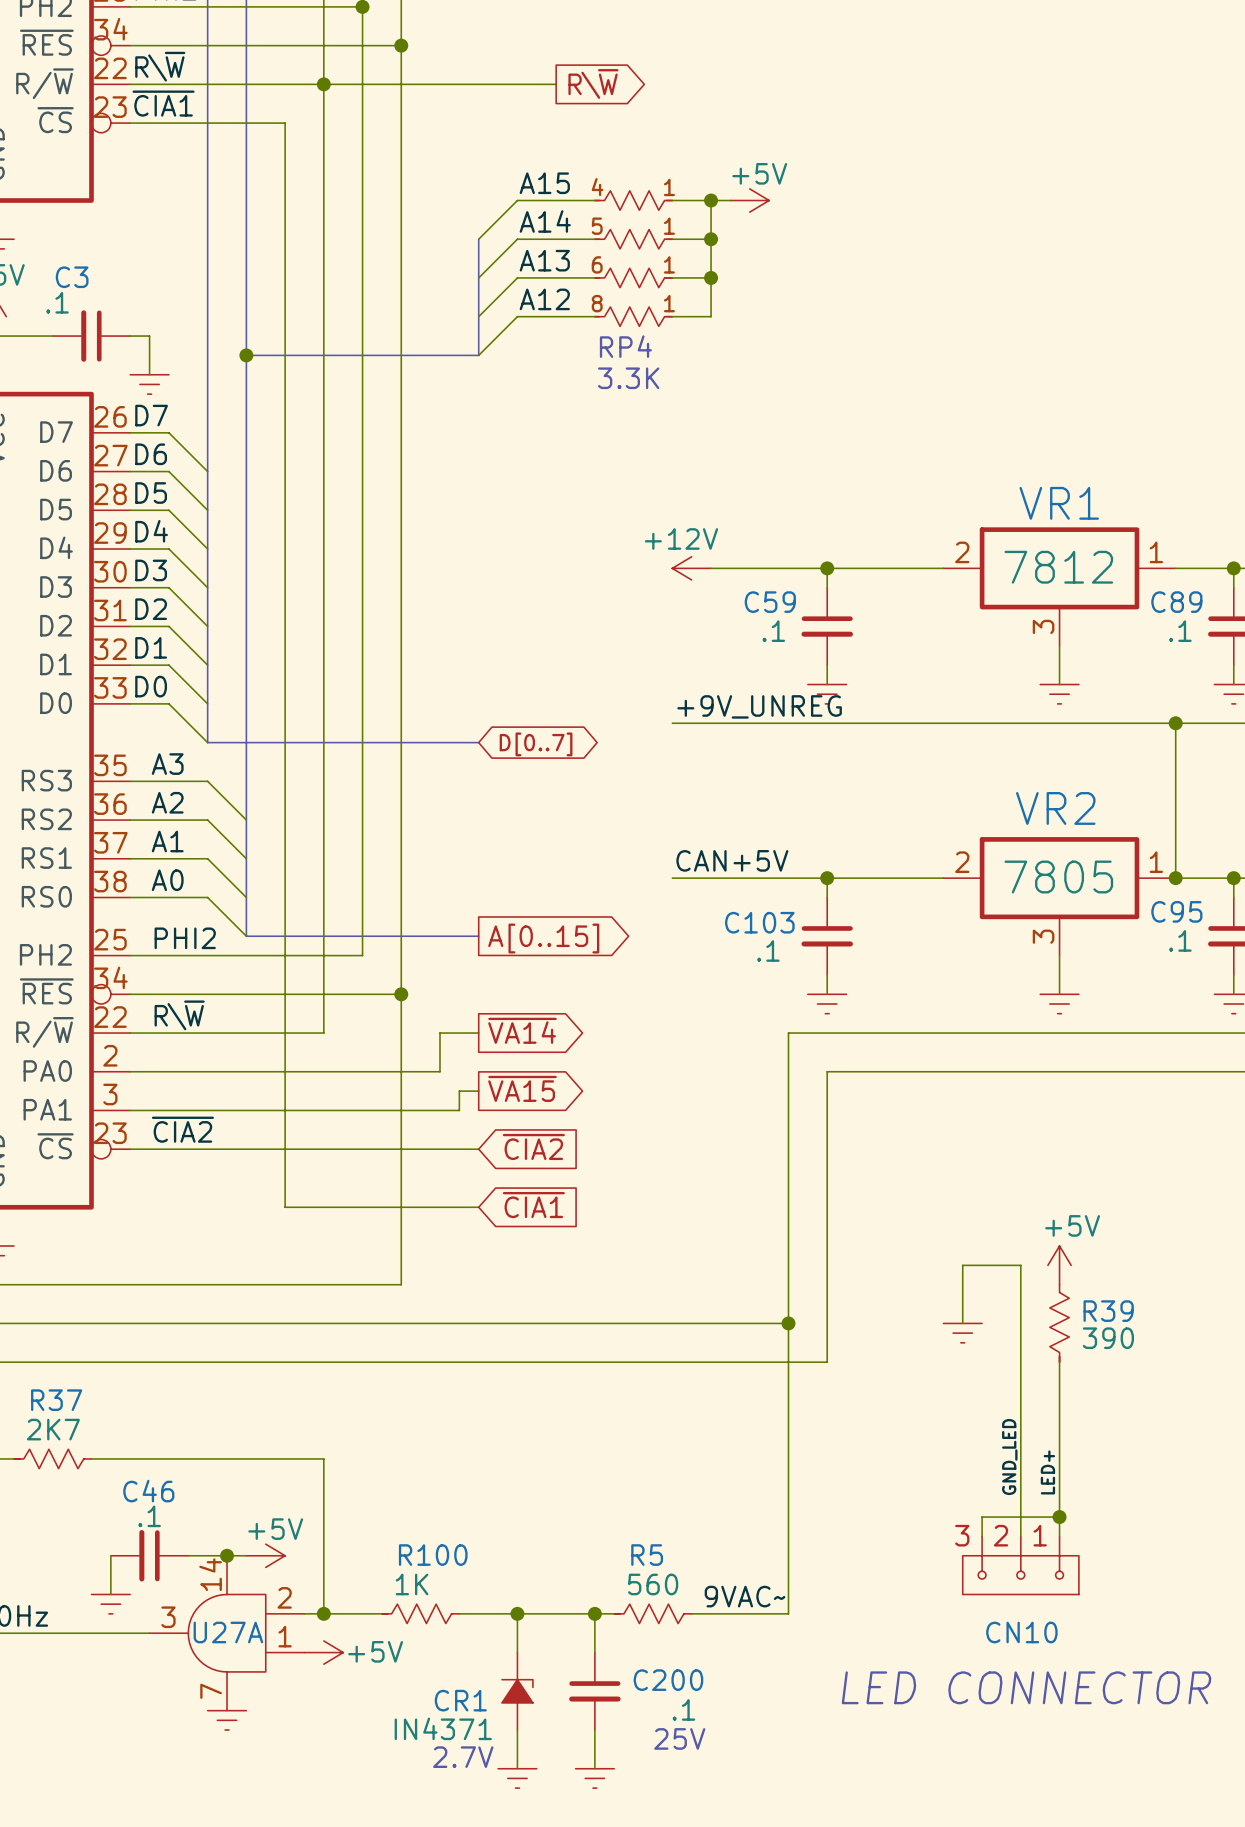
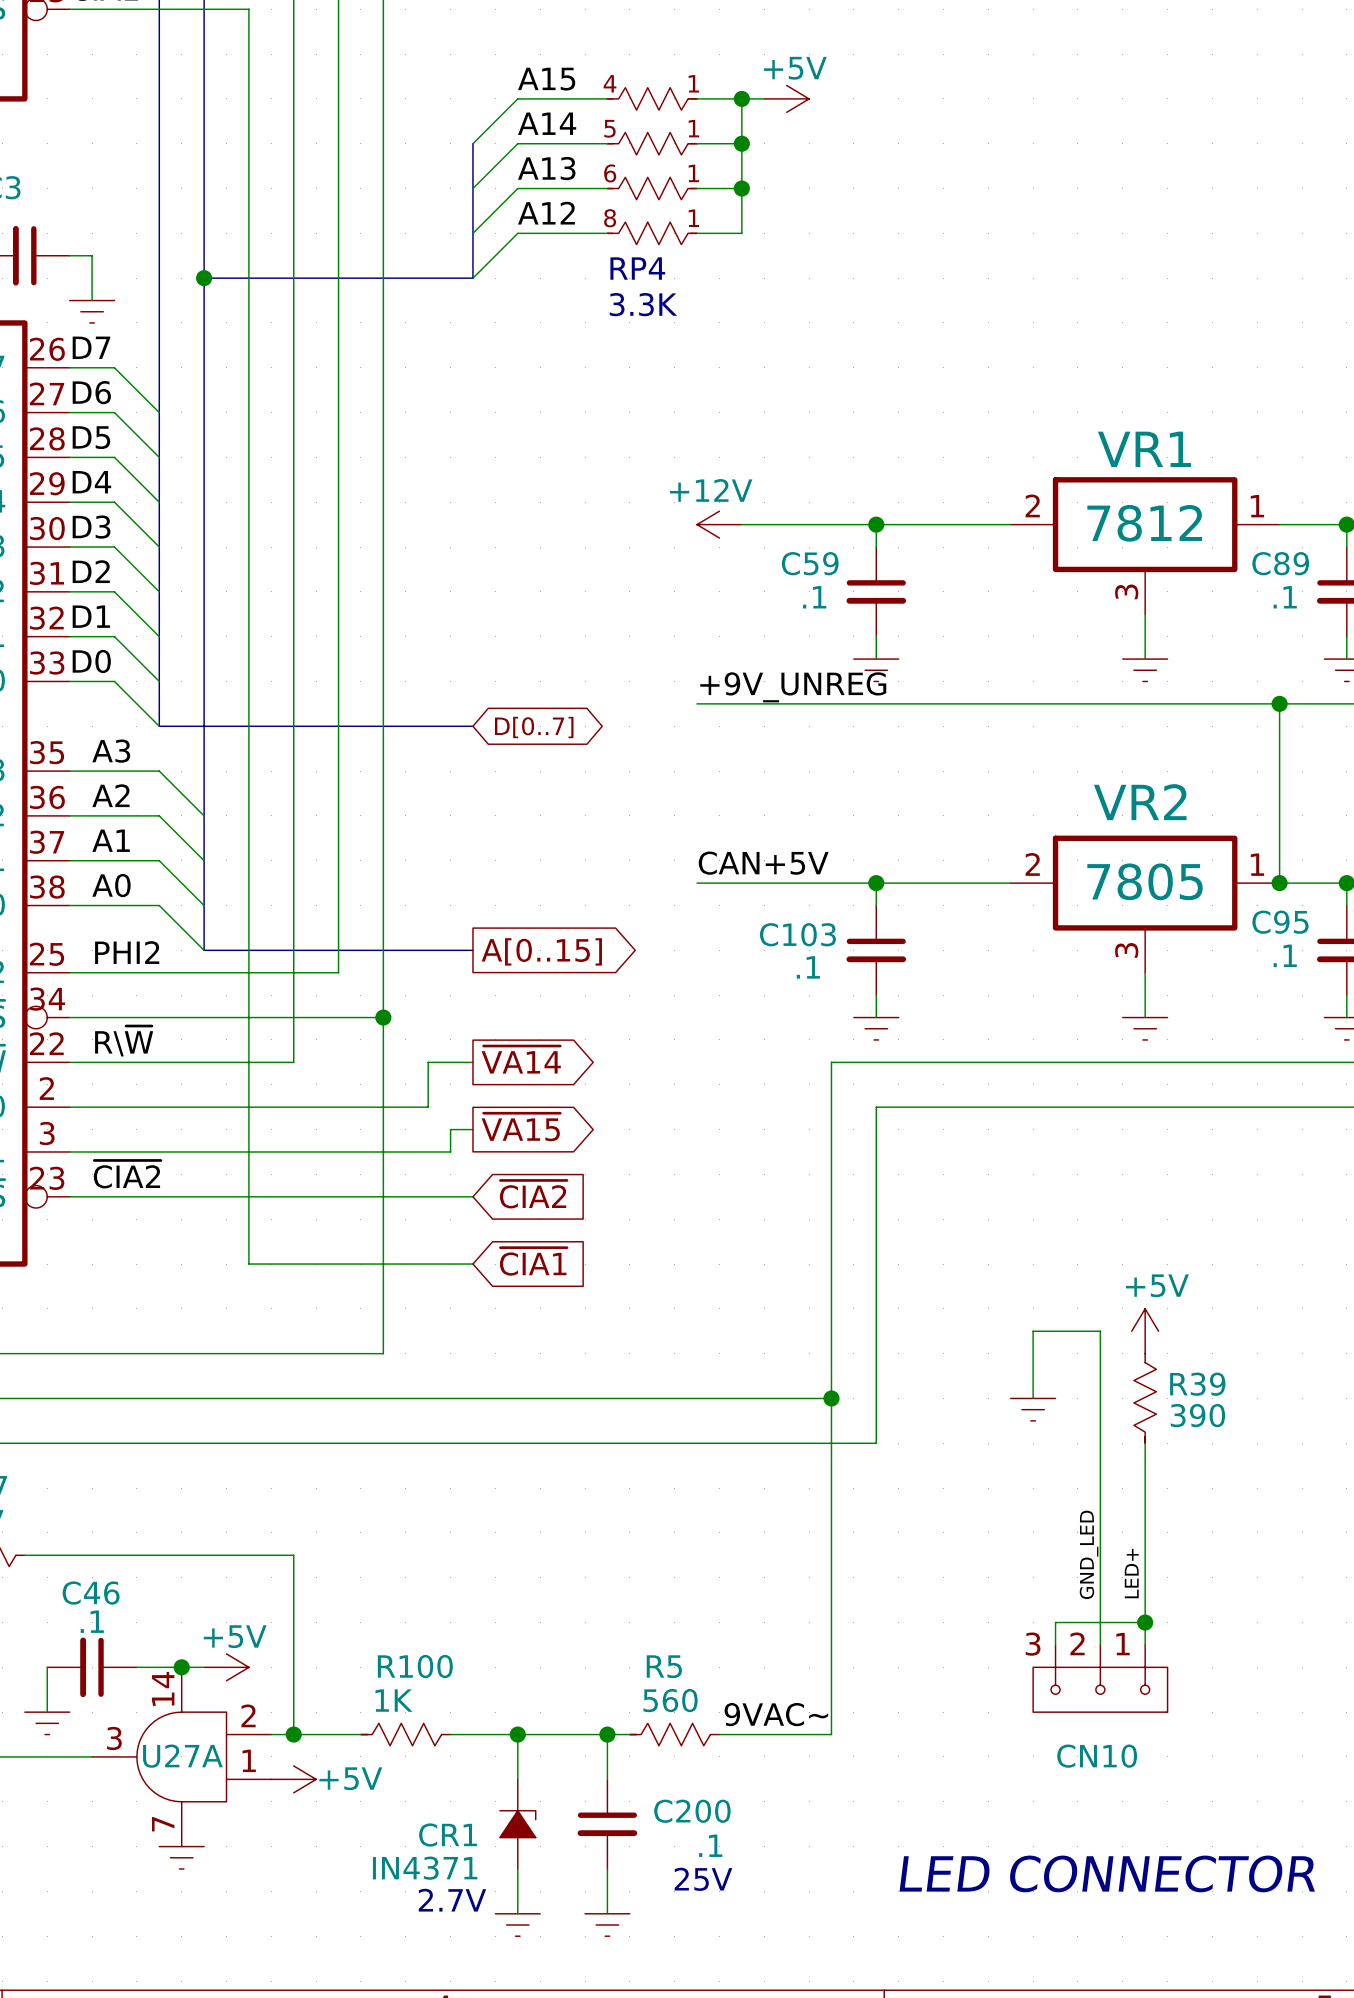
text position: LED CONNECTOR (1026, 1687) -> LED CONNECTOR (1107, 1873)

